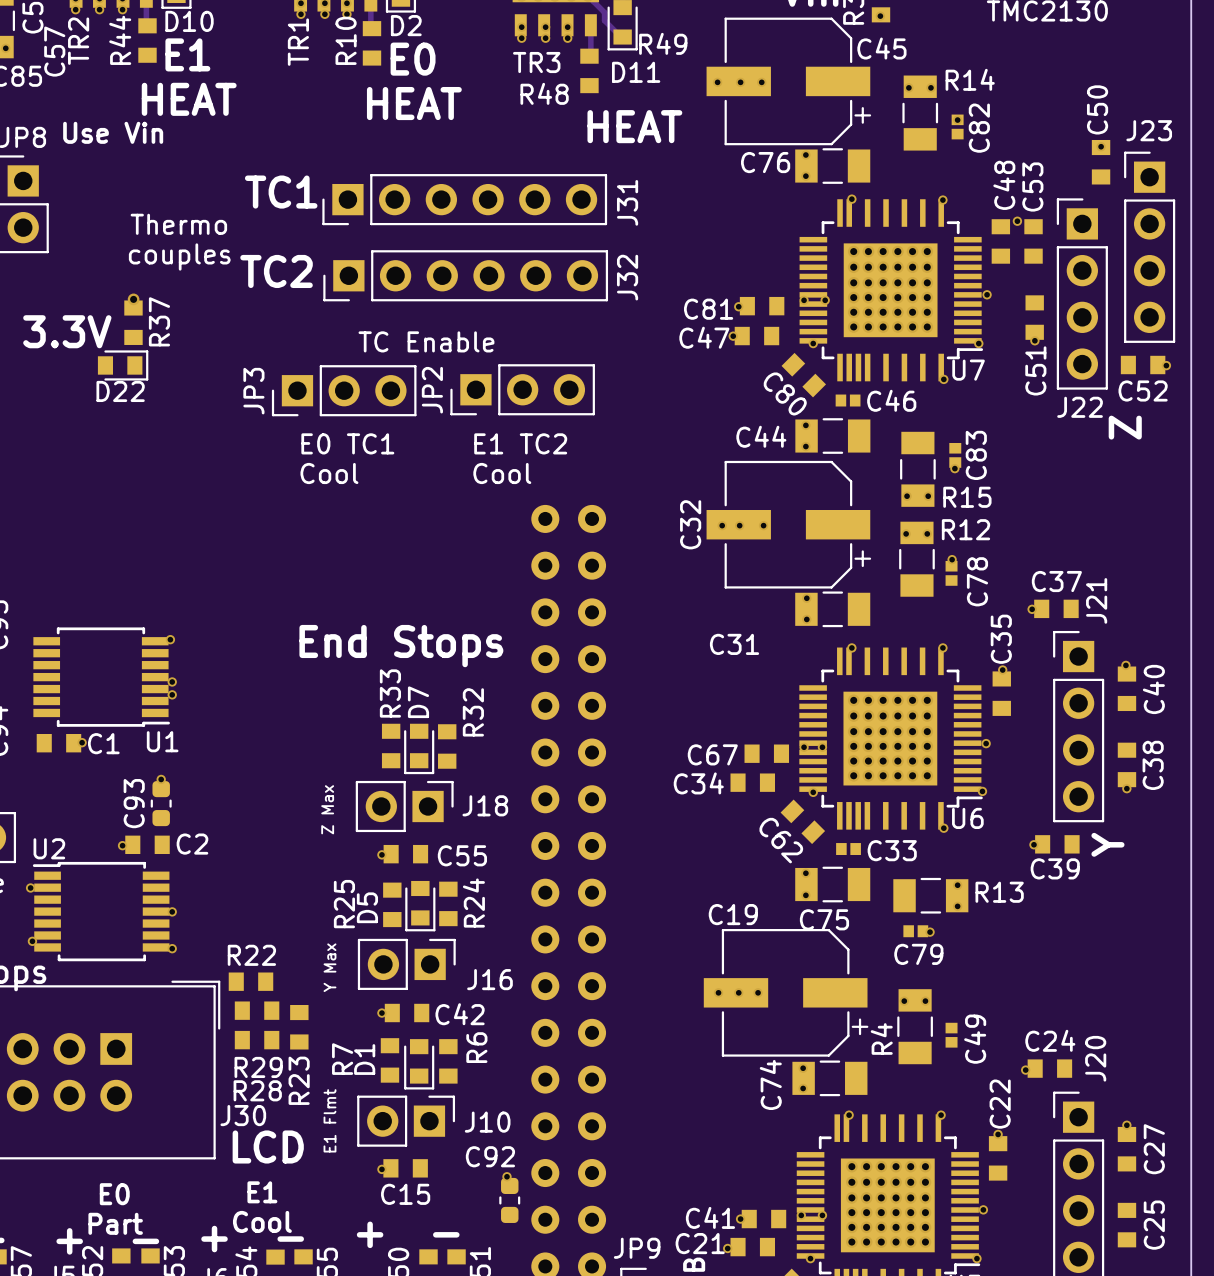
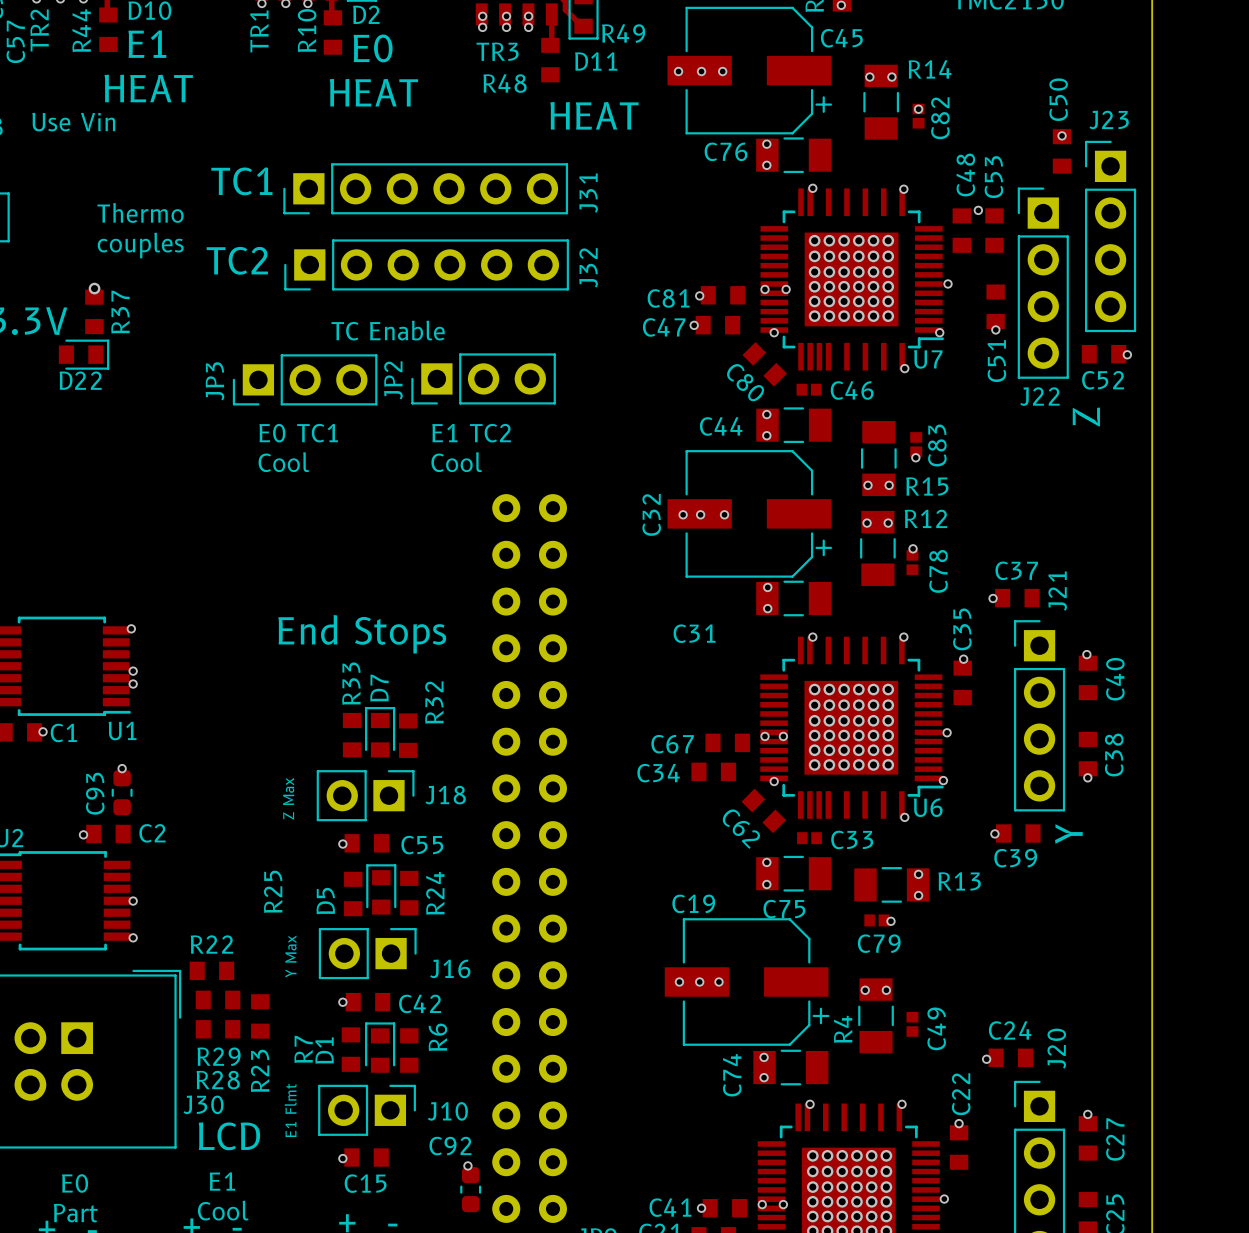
D7 rotation: 0° (419, 748) -> 180° (380, 732)
R25 name position: R25 (344, 904) -> R25 (273, 891)
D5 rotation: 0° (420, 906) -> 180° (381, 889)
D1 rotation: 0° (419, 1064) -> 180° (380, 1047)

